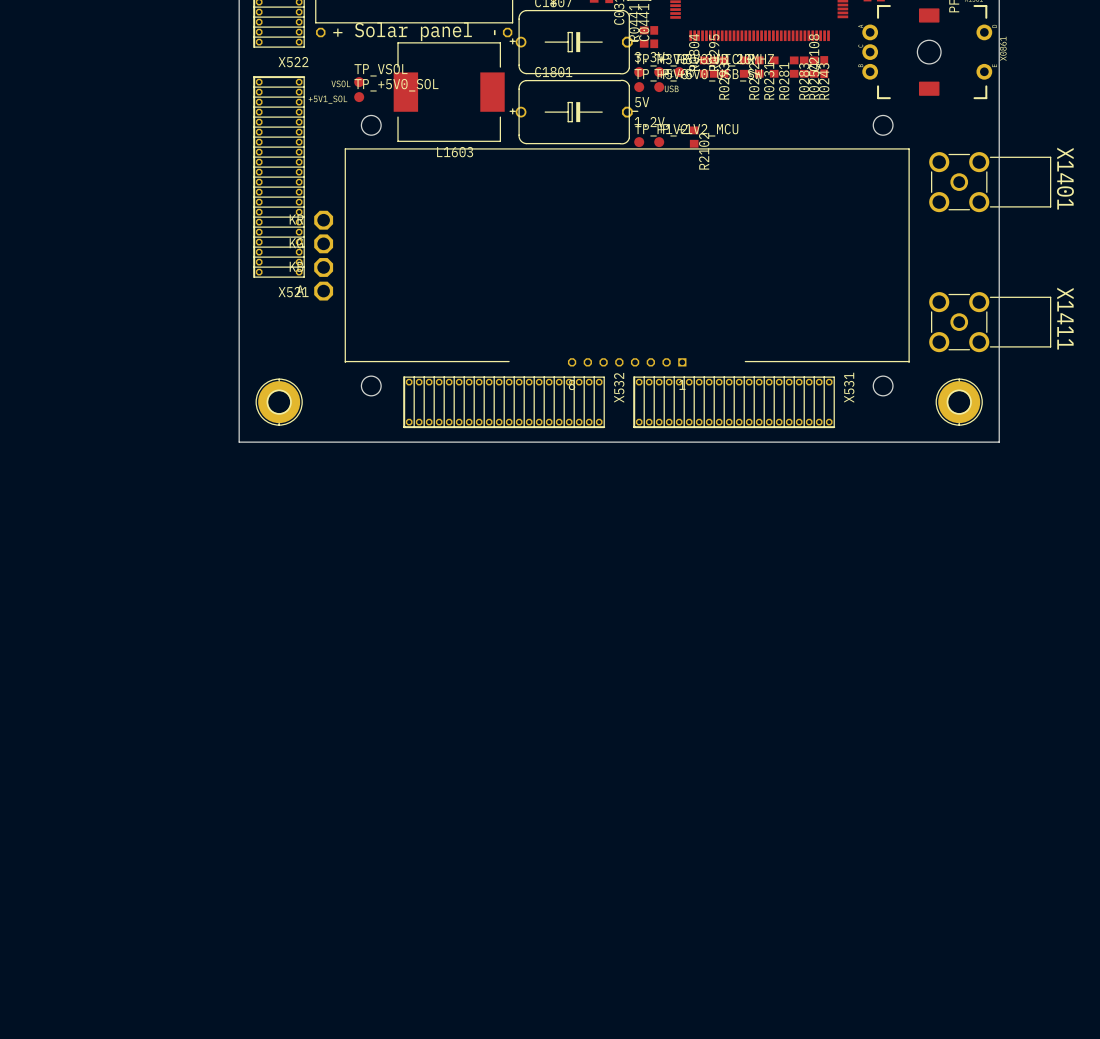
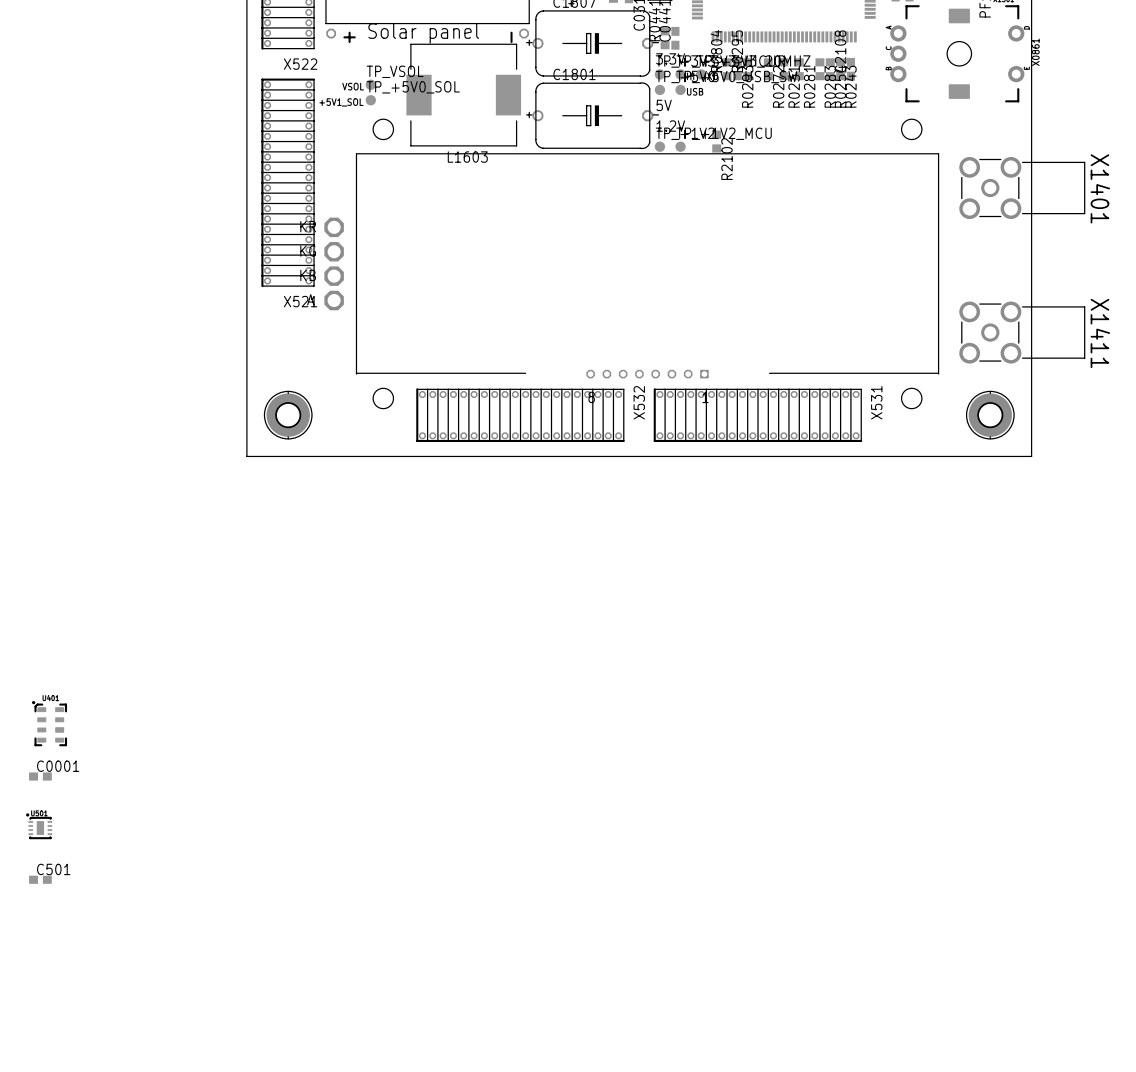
part: none -> (49, 723)
C0001: none -> (40, 776)
part: none -> (39, 826)
C501: none -> (40, 879)

